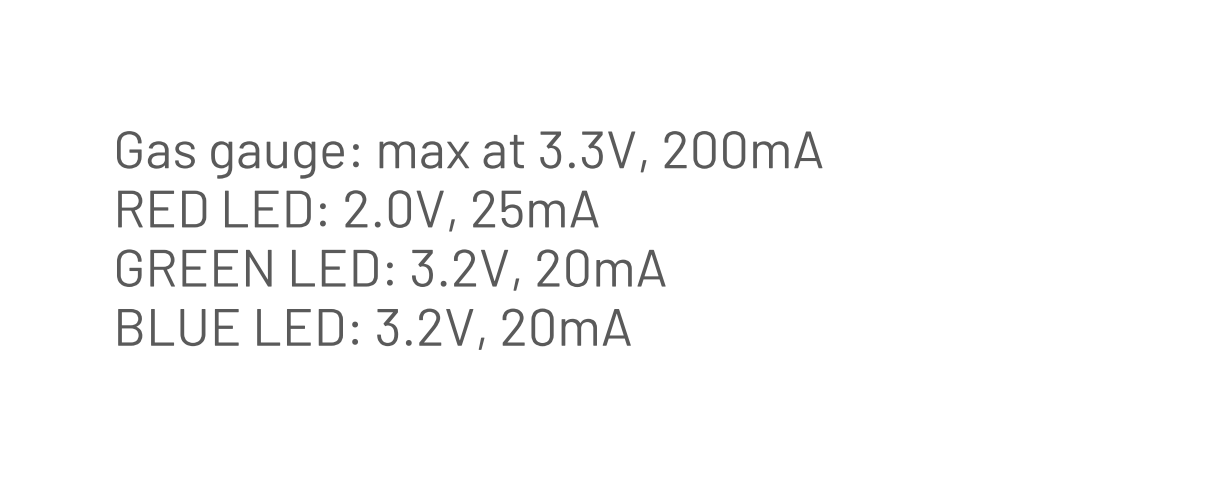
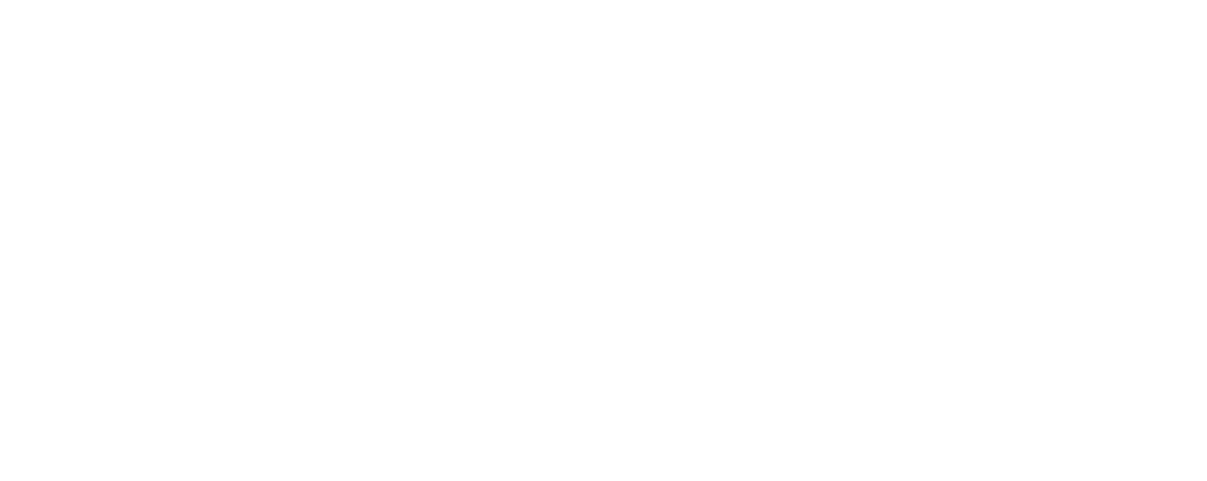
text: Gas gauge: max at 3.3V, 200mA (469, 154) -> none
text: RED LED: 2.0V, 25mA (358, 210) -> none
text: GREEN LED: 3.2V, 20mA (391, 270) -> none
text: BLUE LED: 3.2V, 20mA (374, 329) -> none

